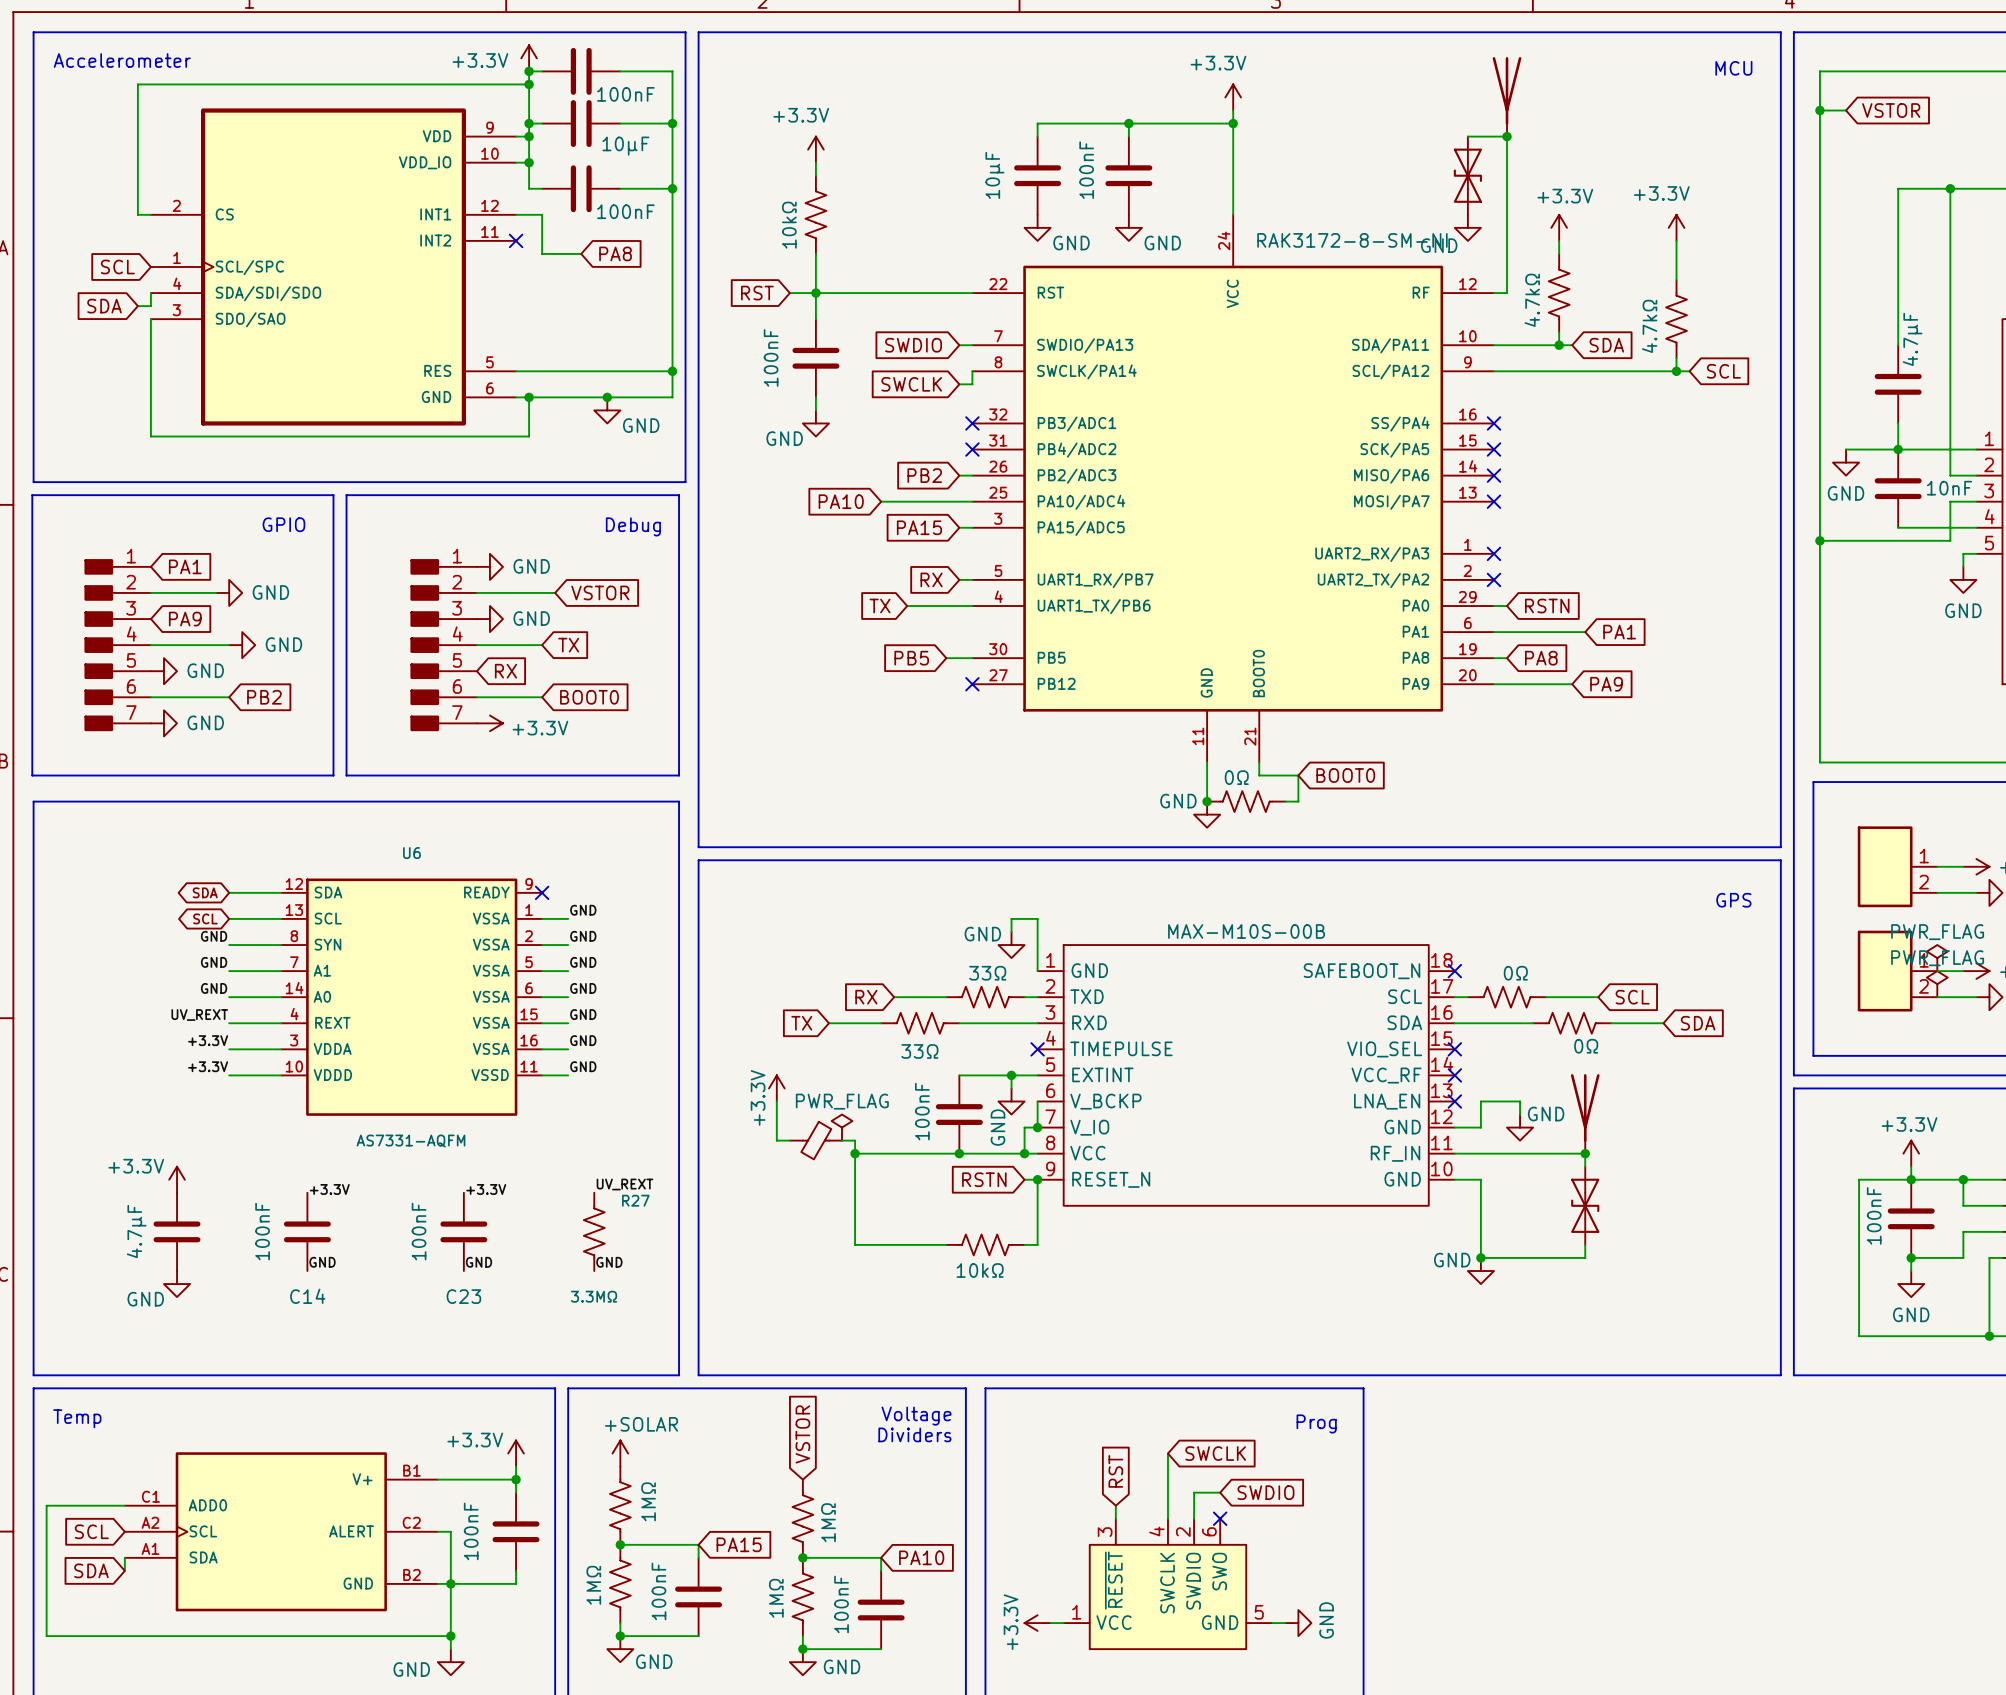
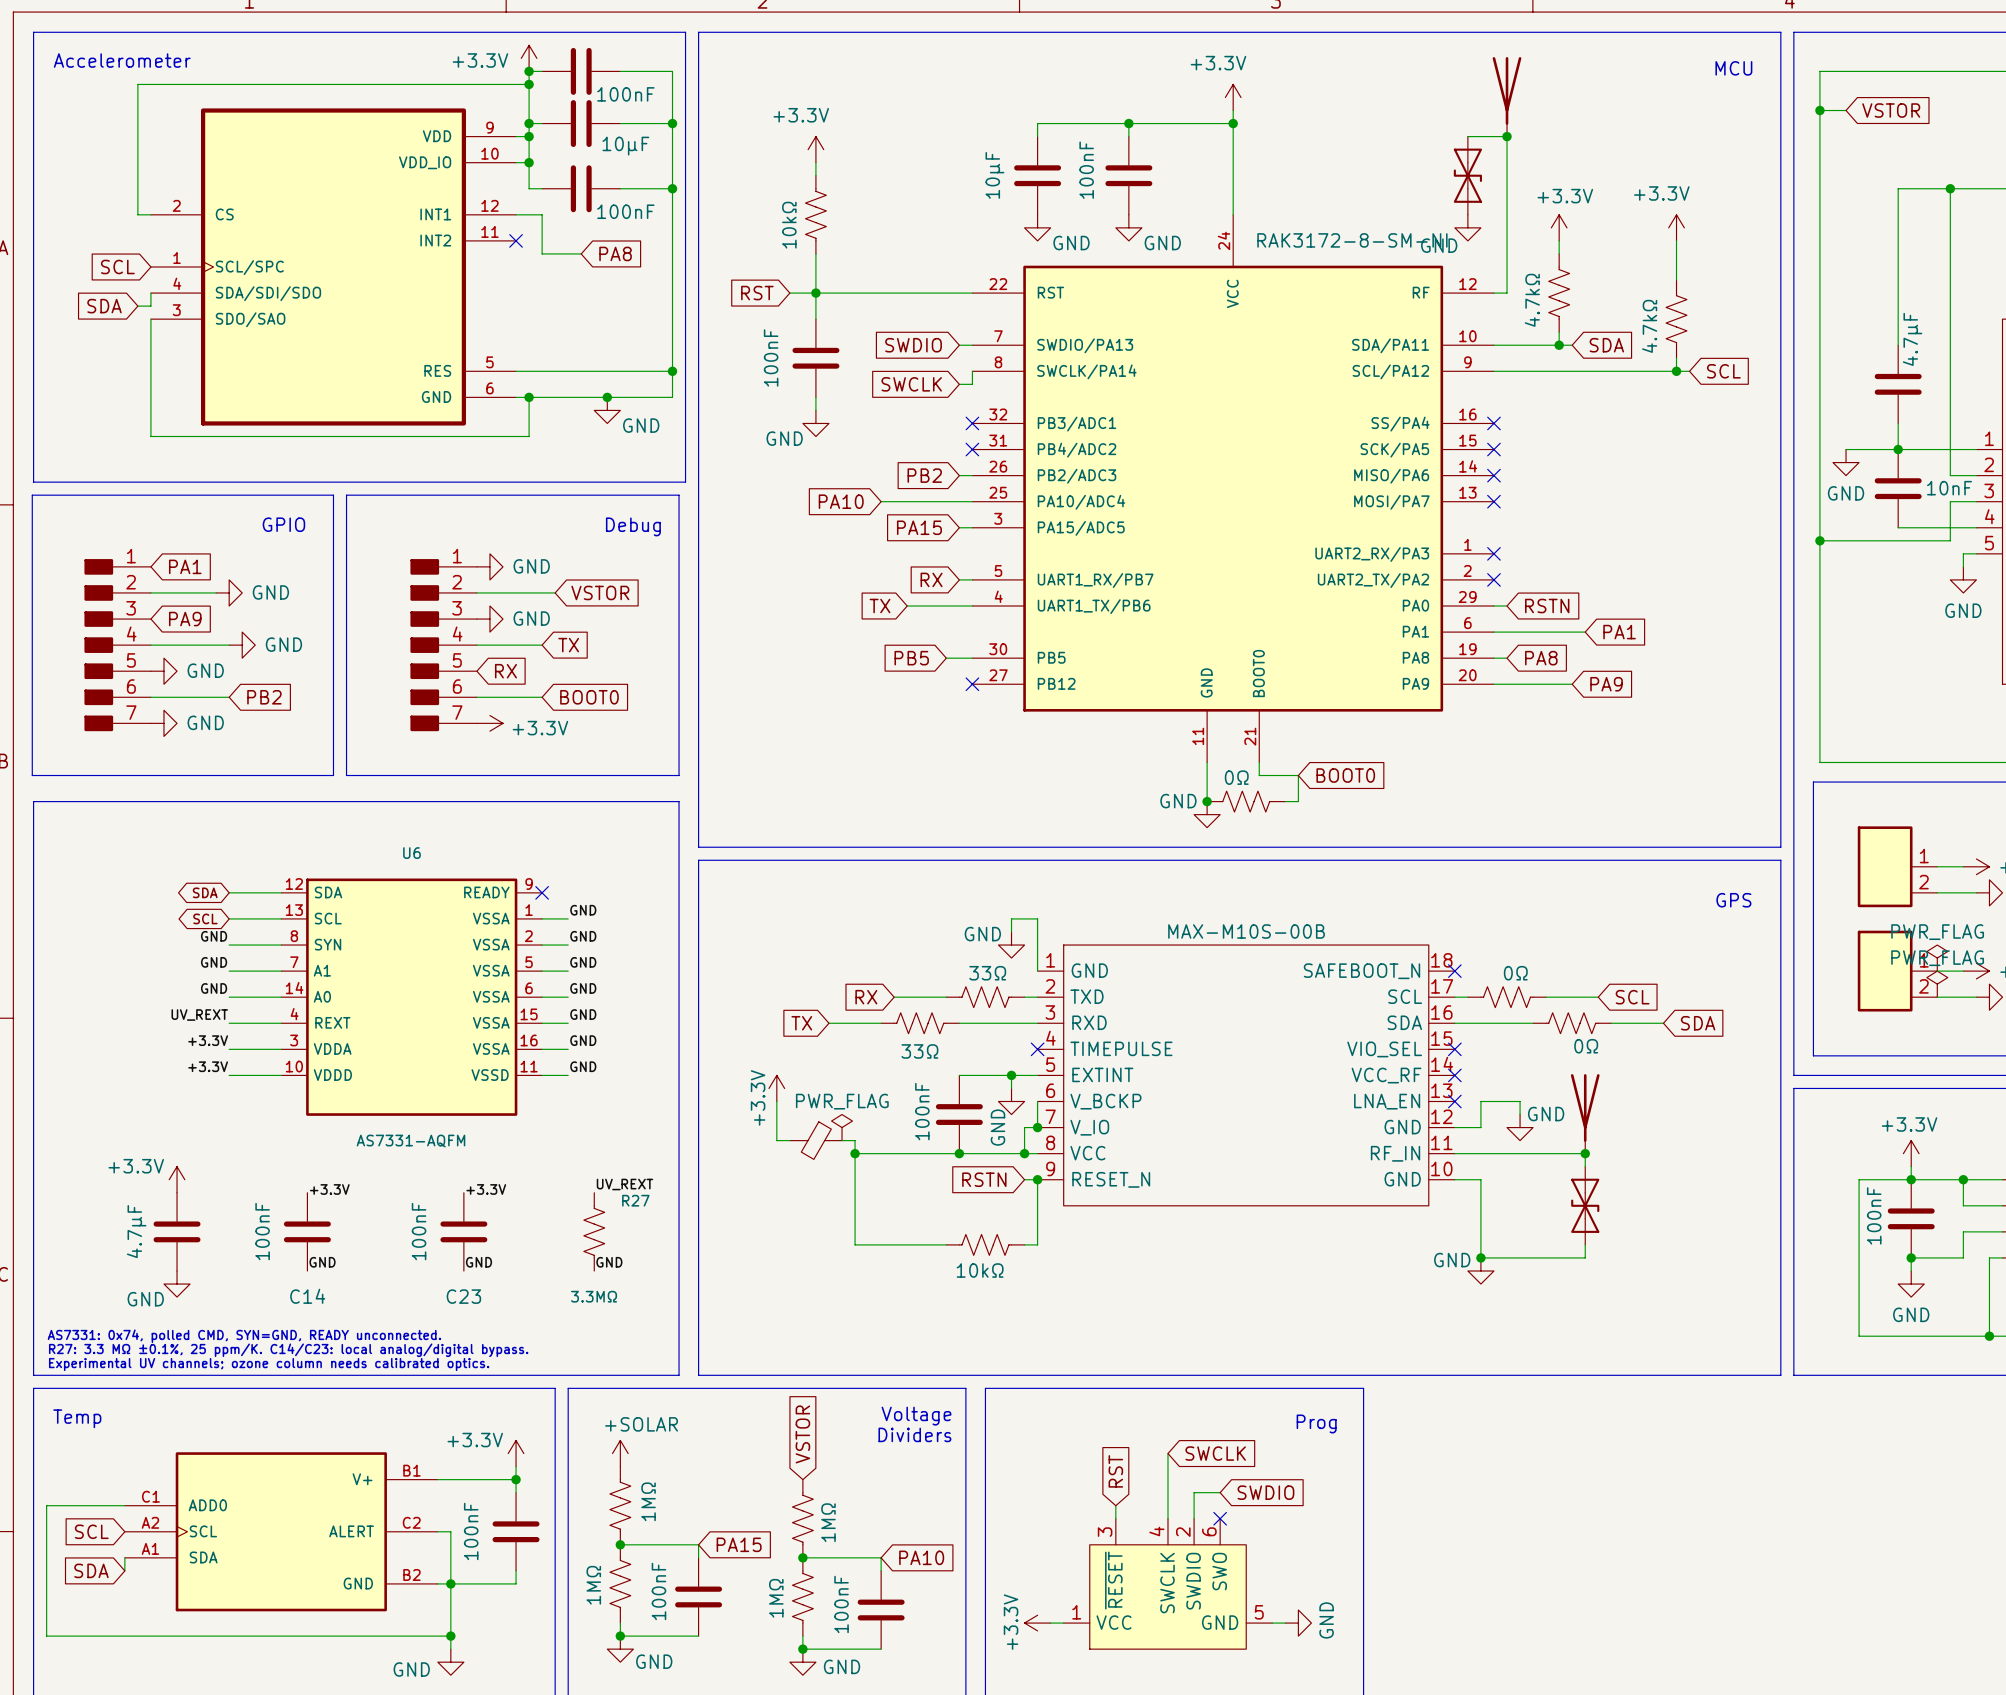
text: none -> AS7331: 0x74, polled CMD, SYN=GND, READY unconnected. (244, 1336)
text: none -> R27: 3.3 MΩ ±0.1%, 25 ppm/K. C14/C23: local analog/digital bypass. (288, 1350)
text: none -> Experimental UV channels; ozone column needs calibrated optics. (269, 1364)

